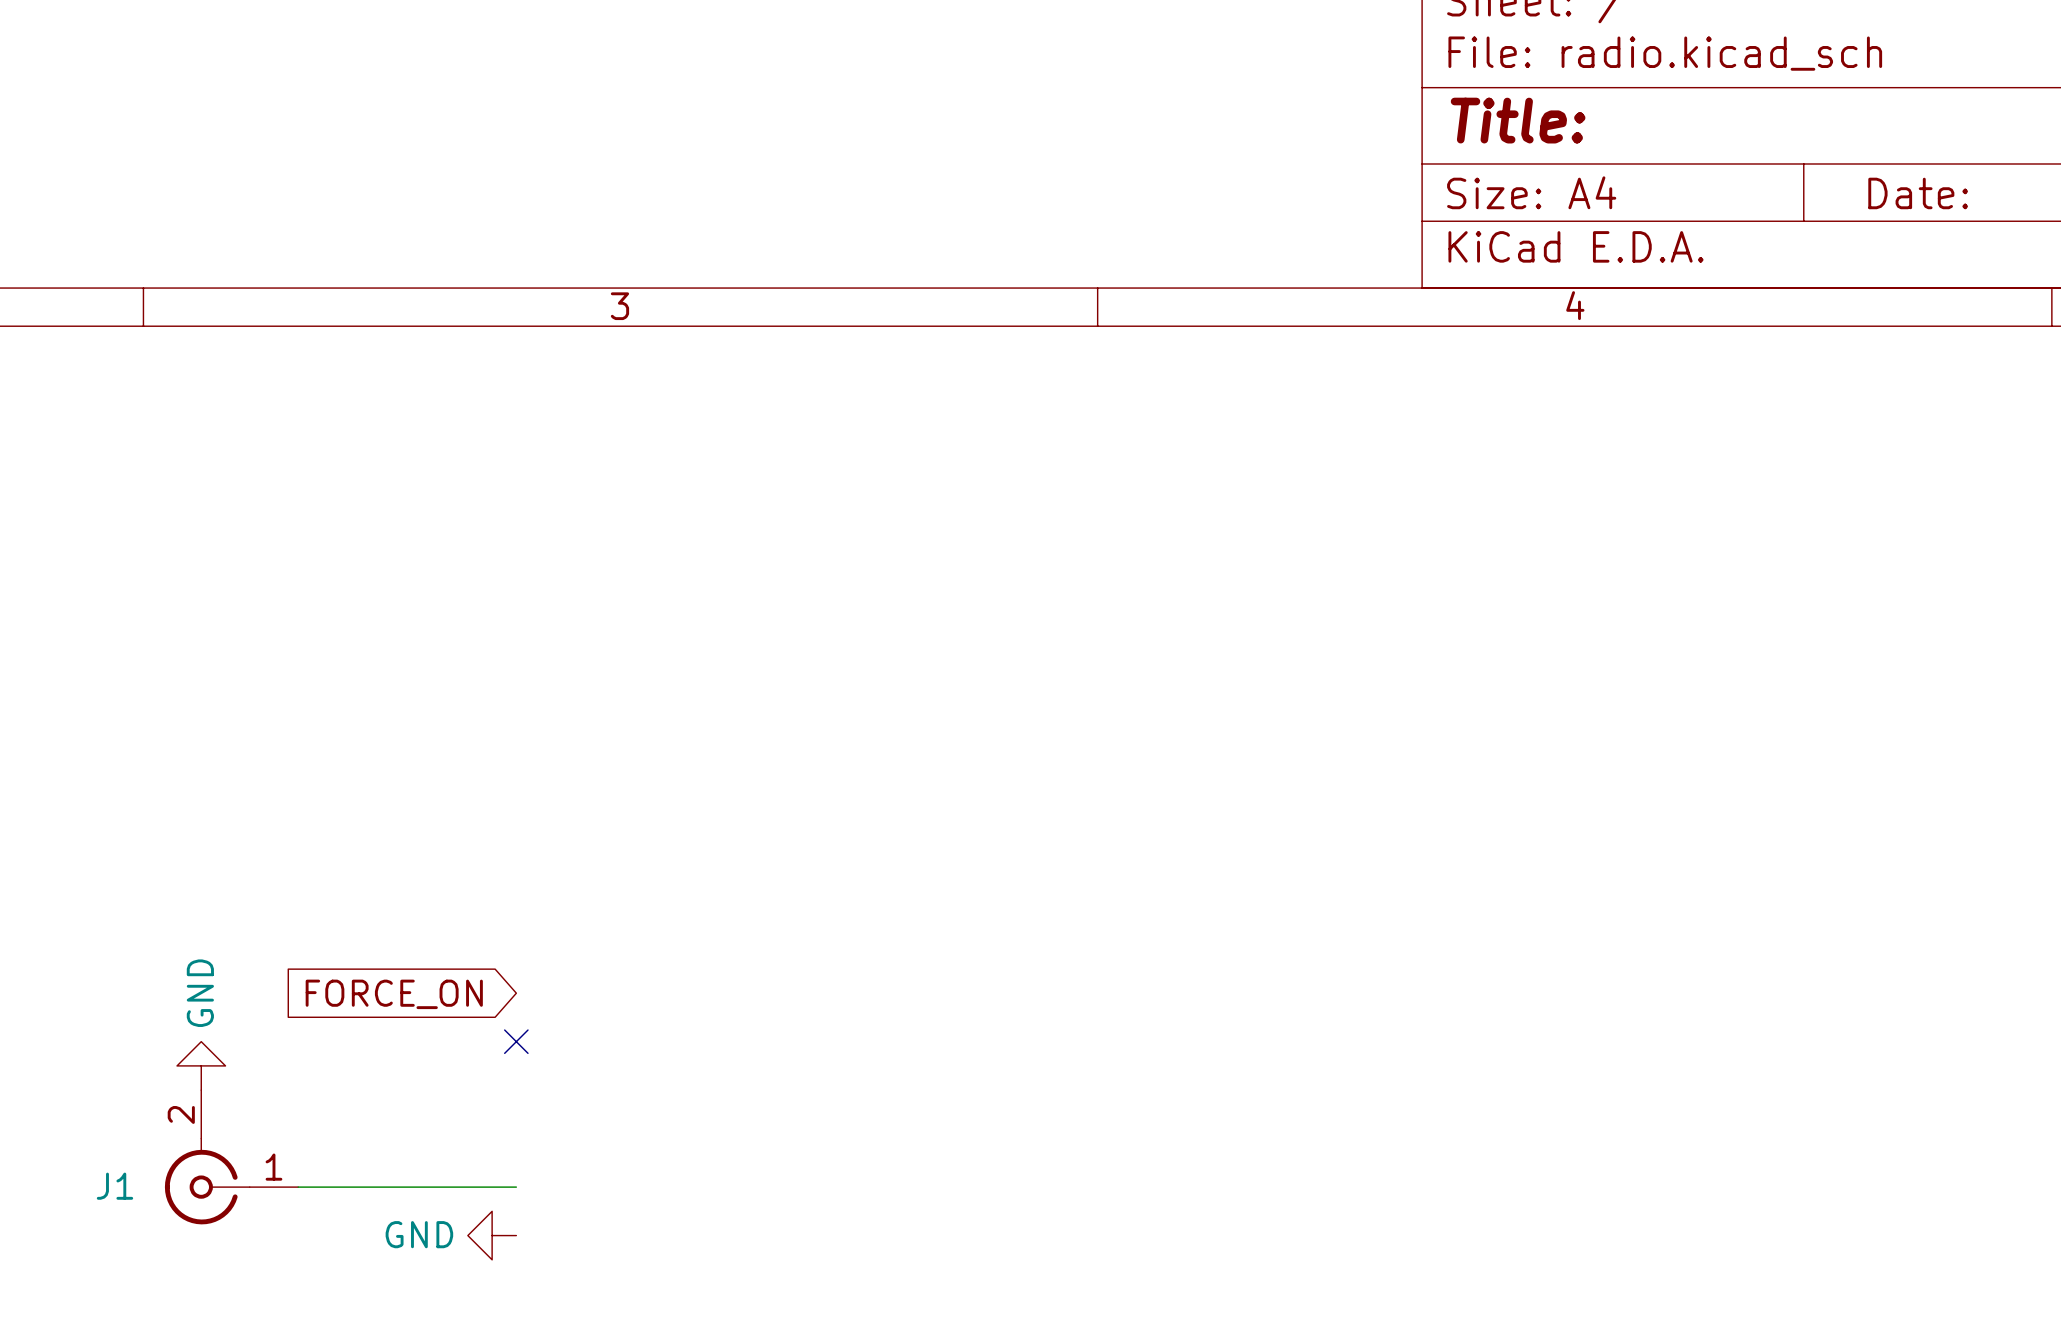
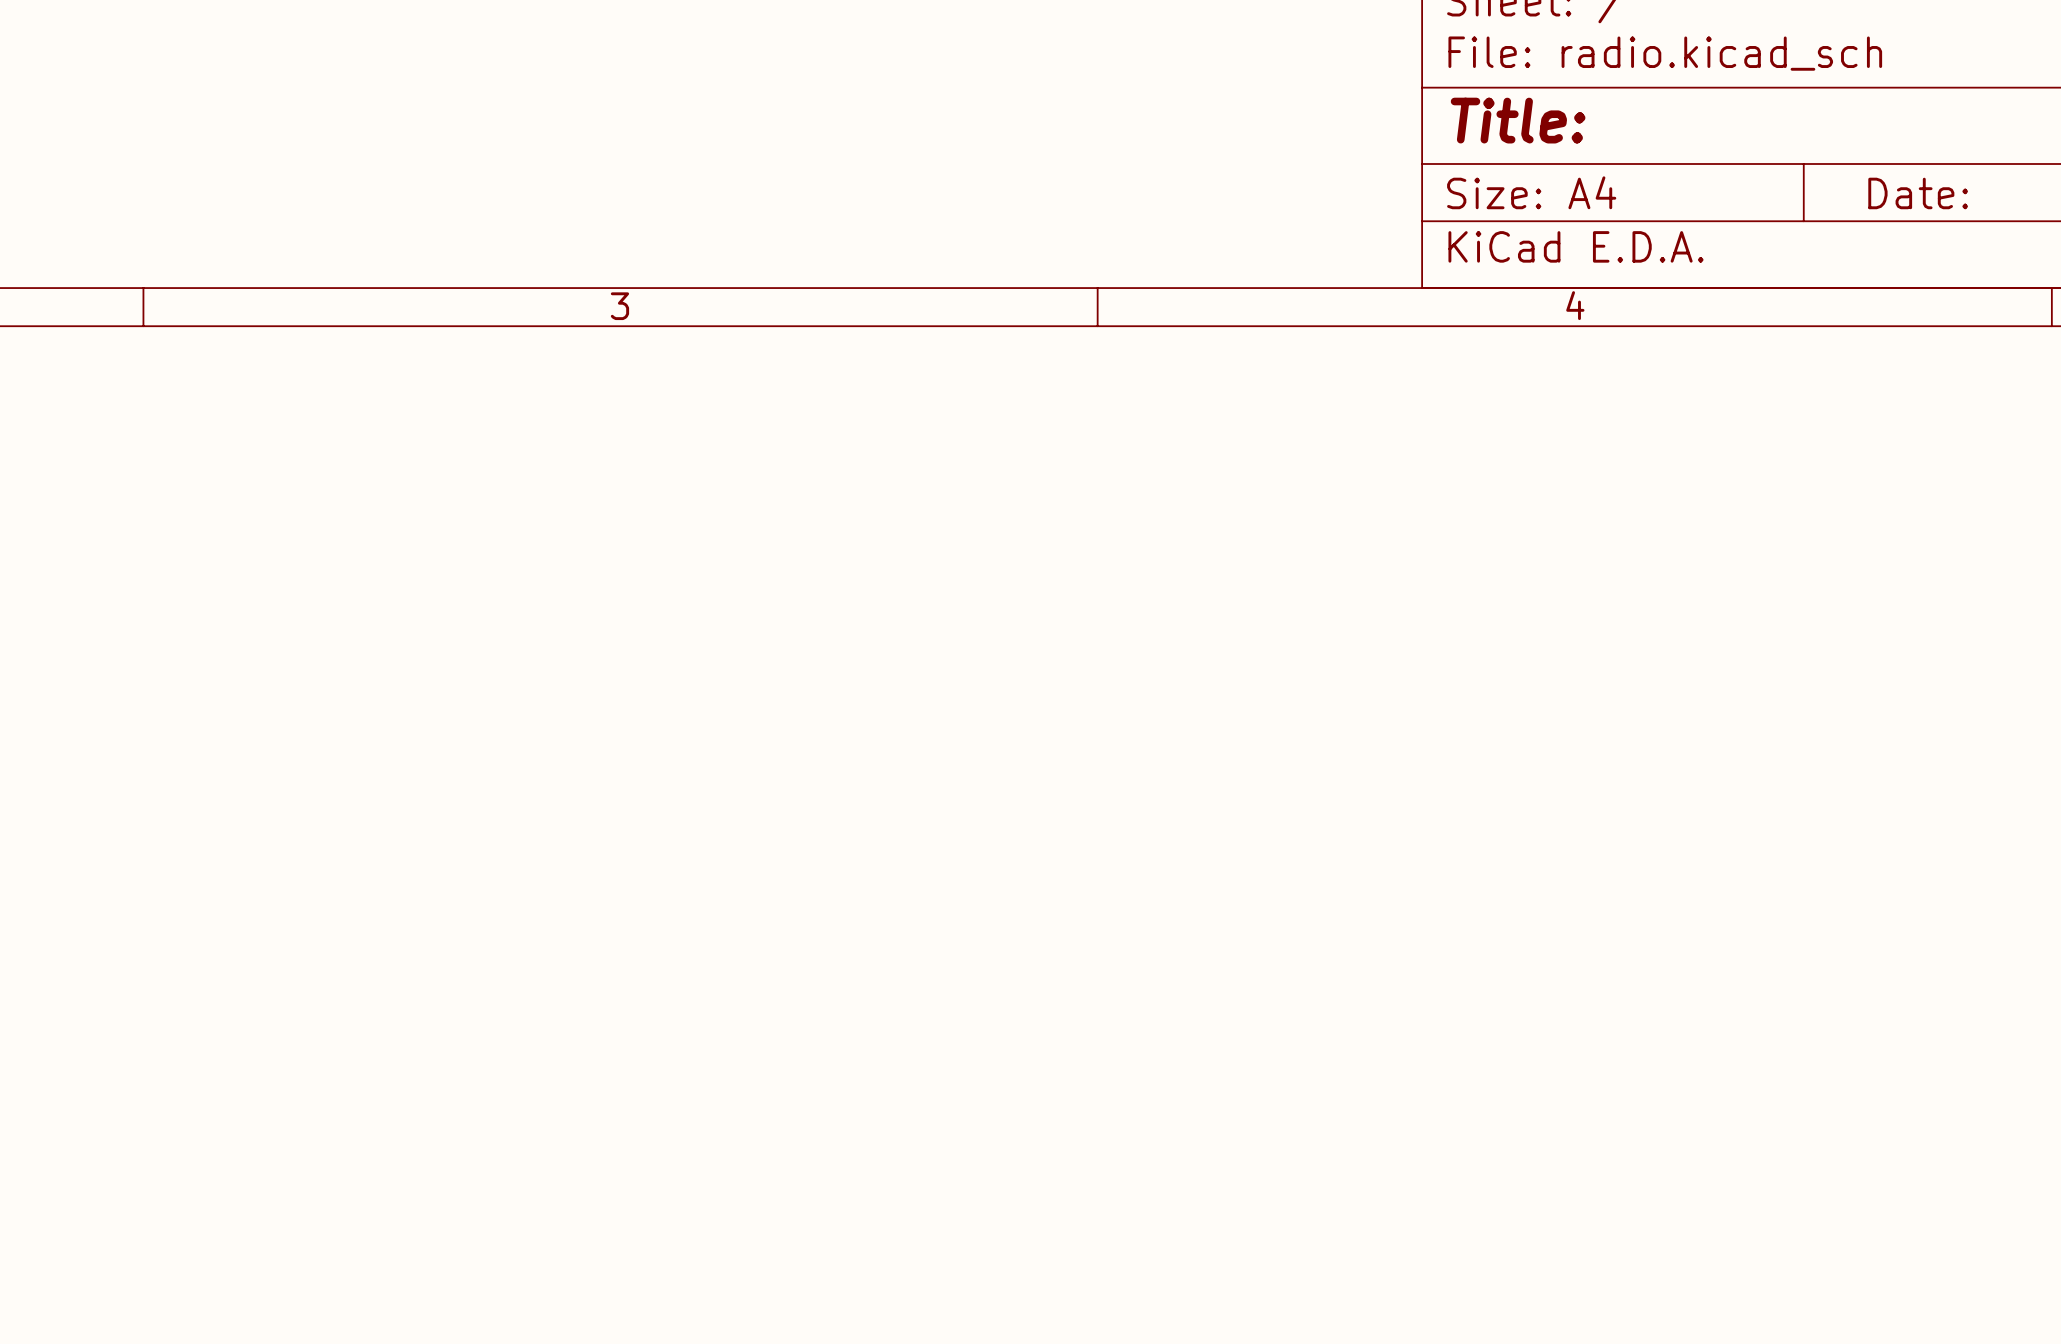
global label: FORCE_ON (394, 994) -> none
no-connect mark: (516, 1041) -> none
power symbol: GND (201, 1065) -> none
J1: (231, 1157) -> none
wire: (298, 1187) (516, 1187) -> none
power symbol: GND (492, 1235) -> none

